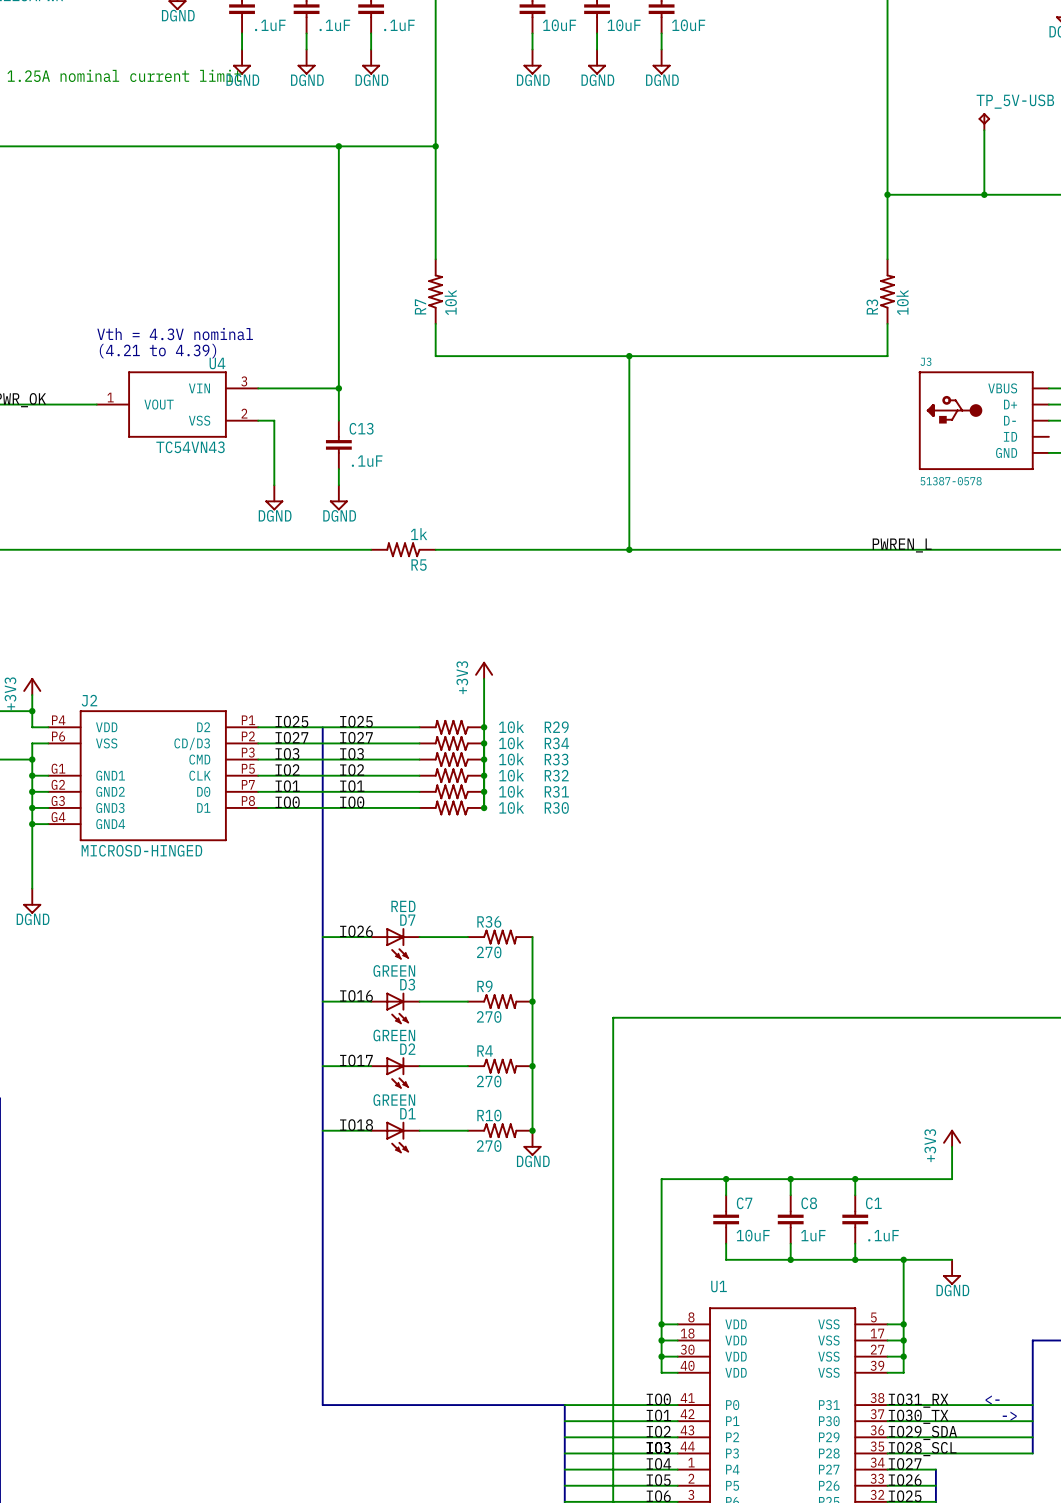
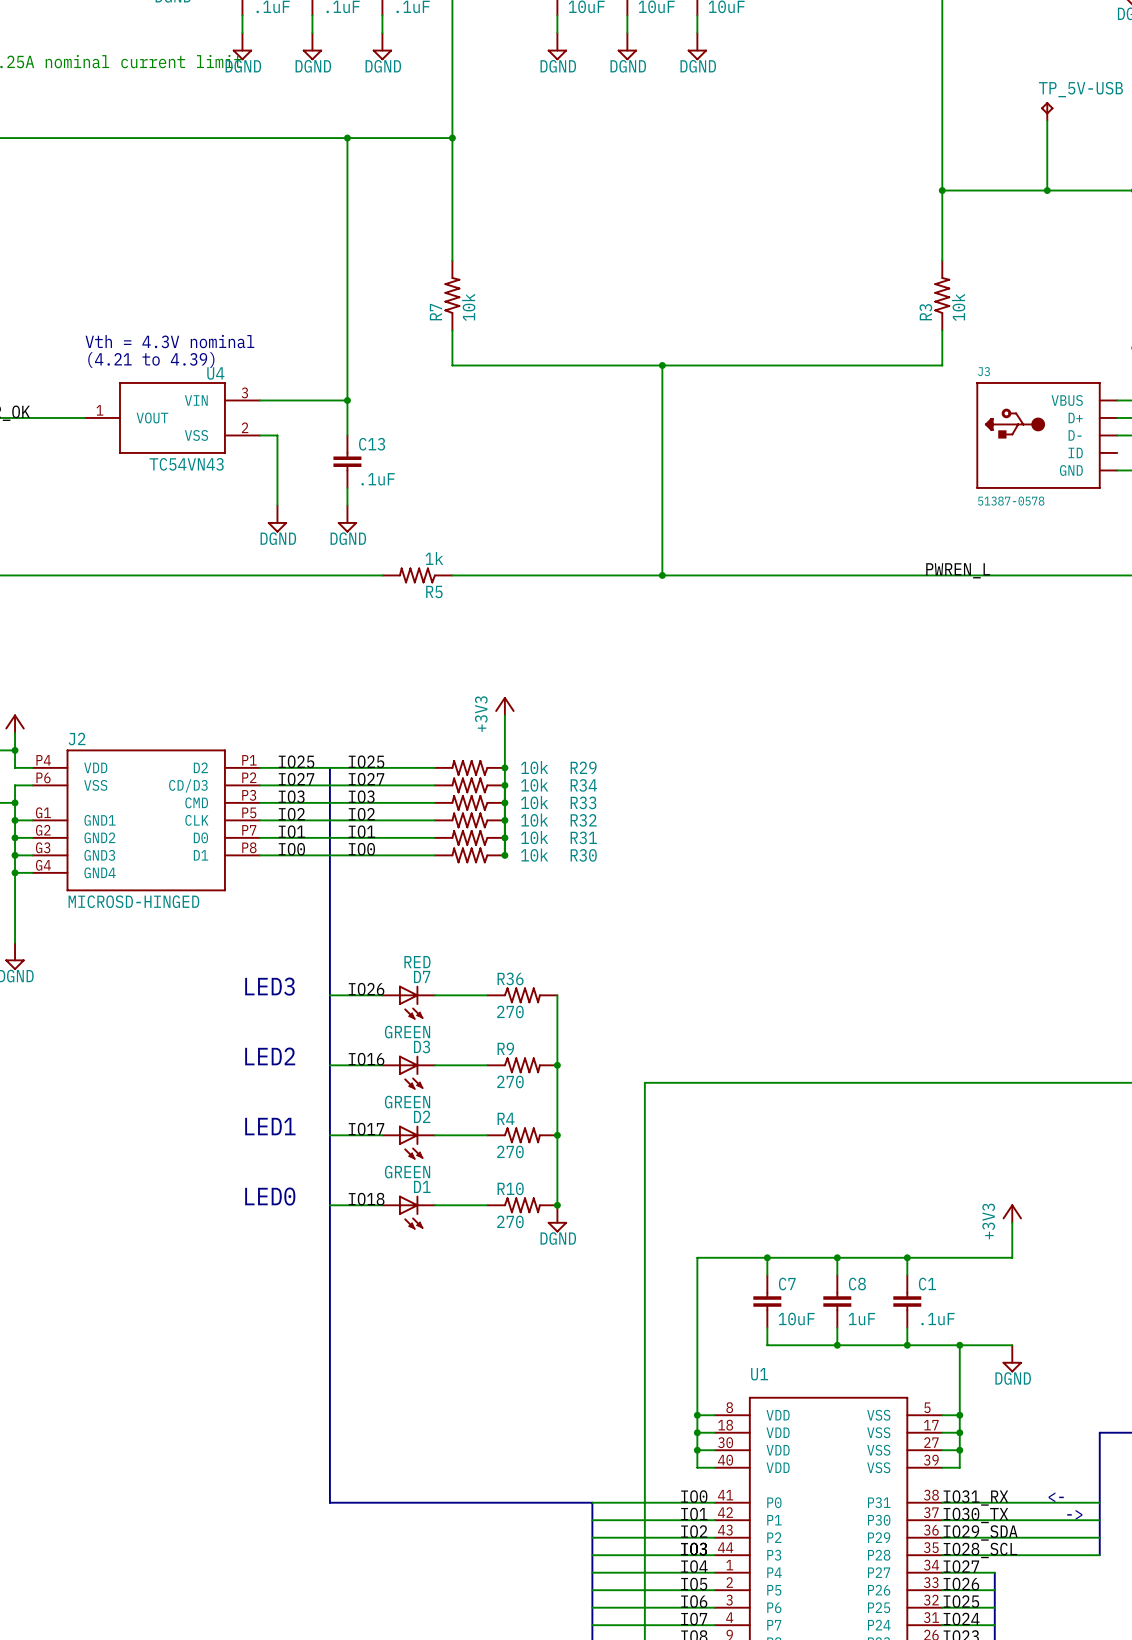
text: none -> LED3 (269, 986)
text: none -> LED2 (270, 1056)
text: none -> LED1 (270, 1126)
text: none -> LED0 (270, 1196)

